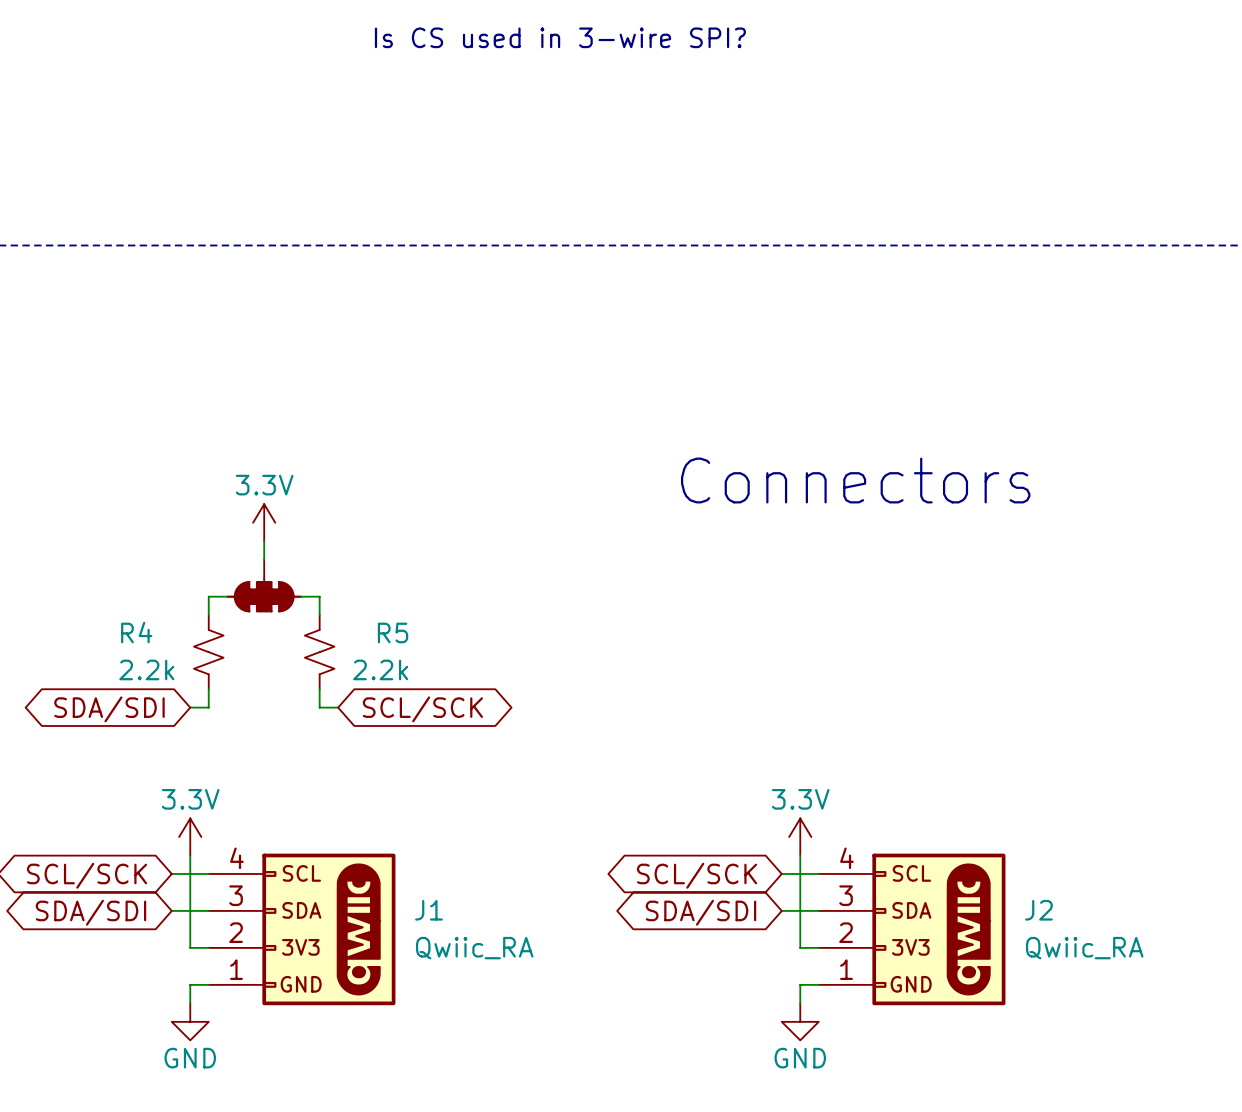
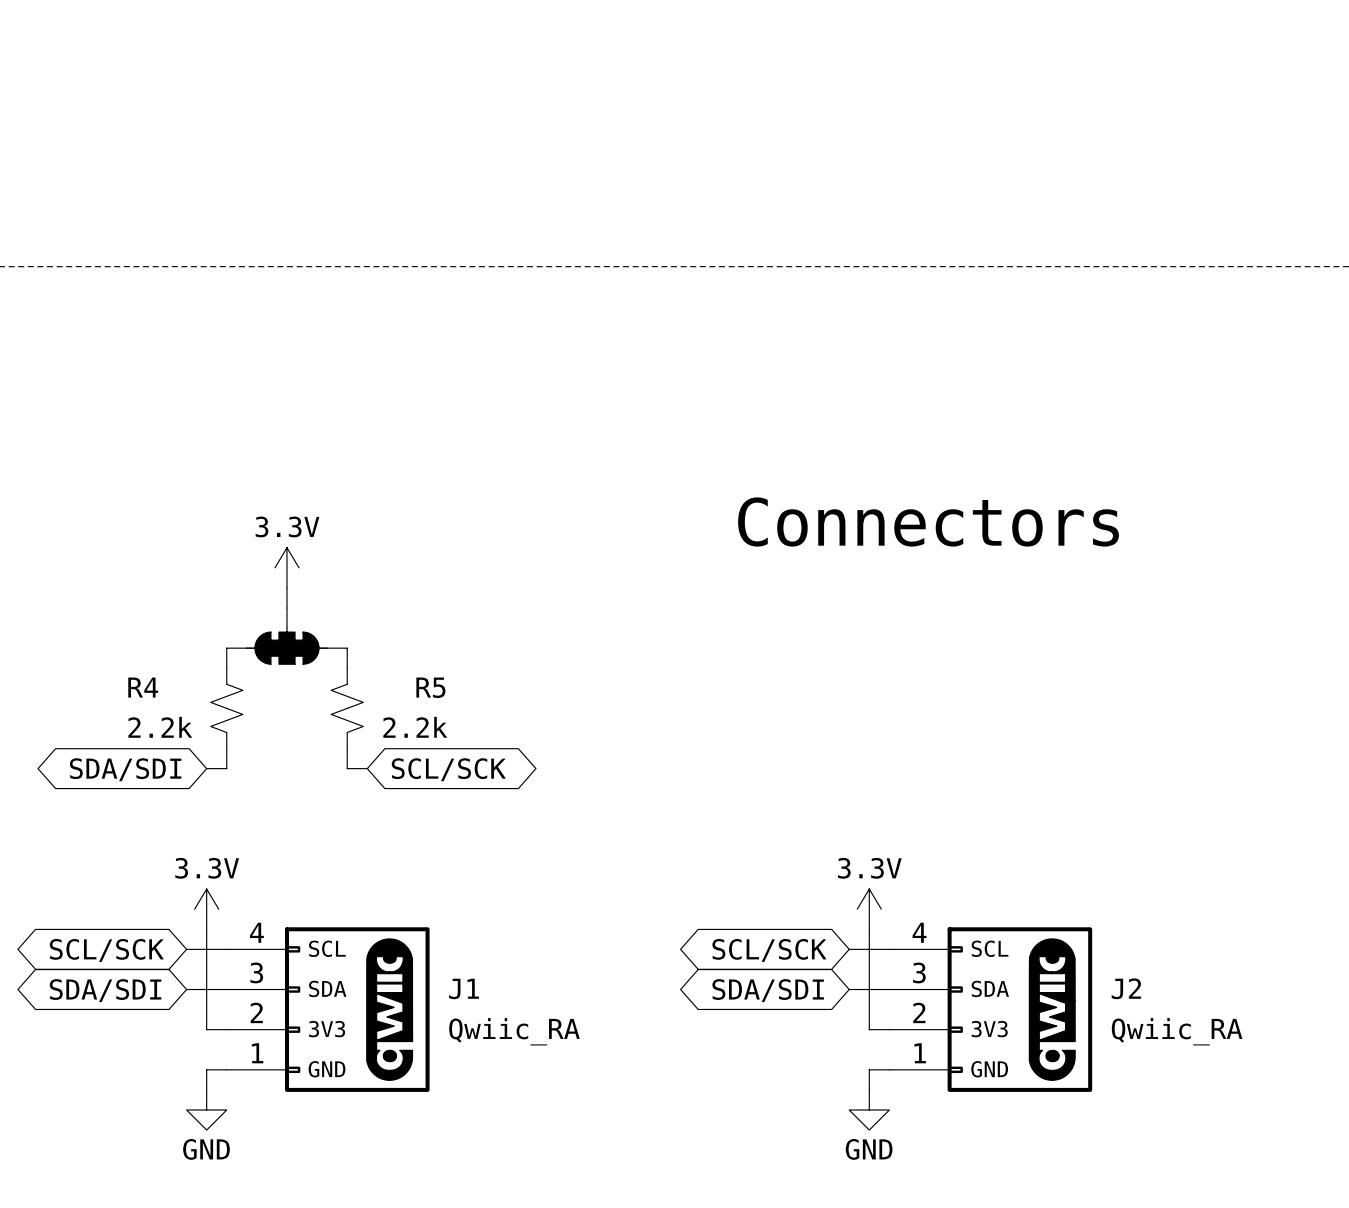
text: Is CS used in 3-wire SPI? (560, 37) -> none

